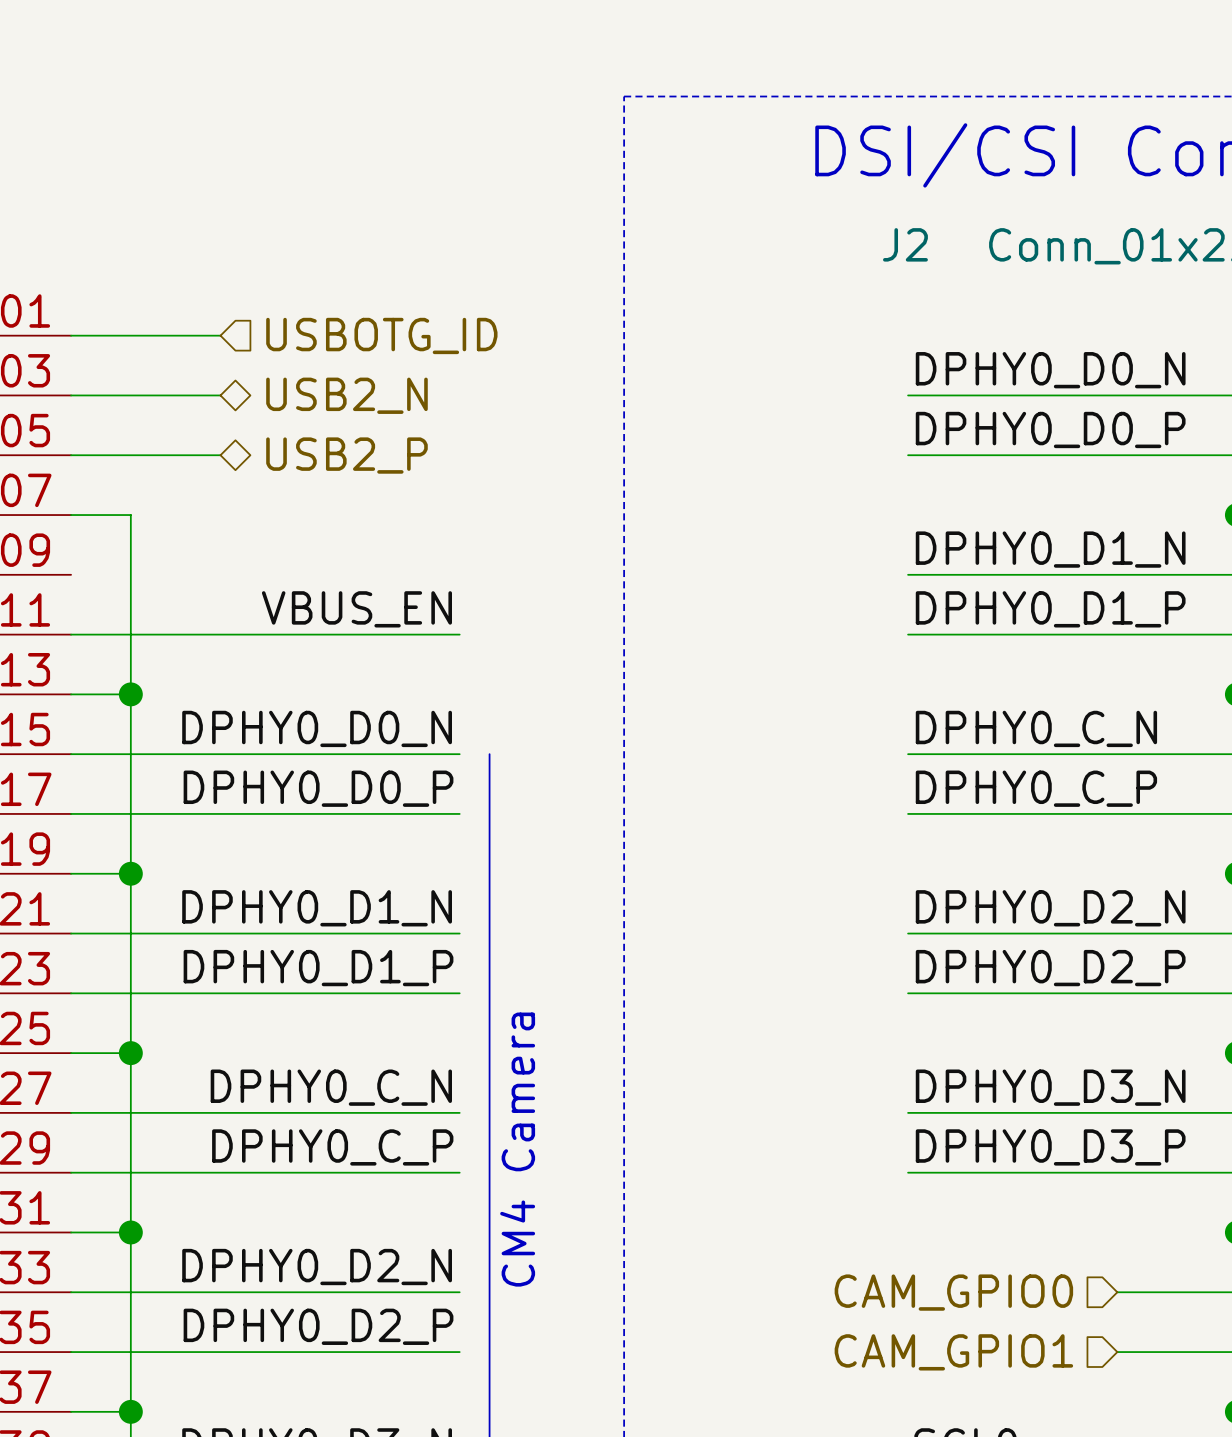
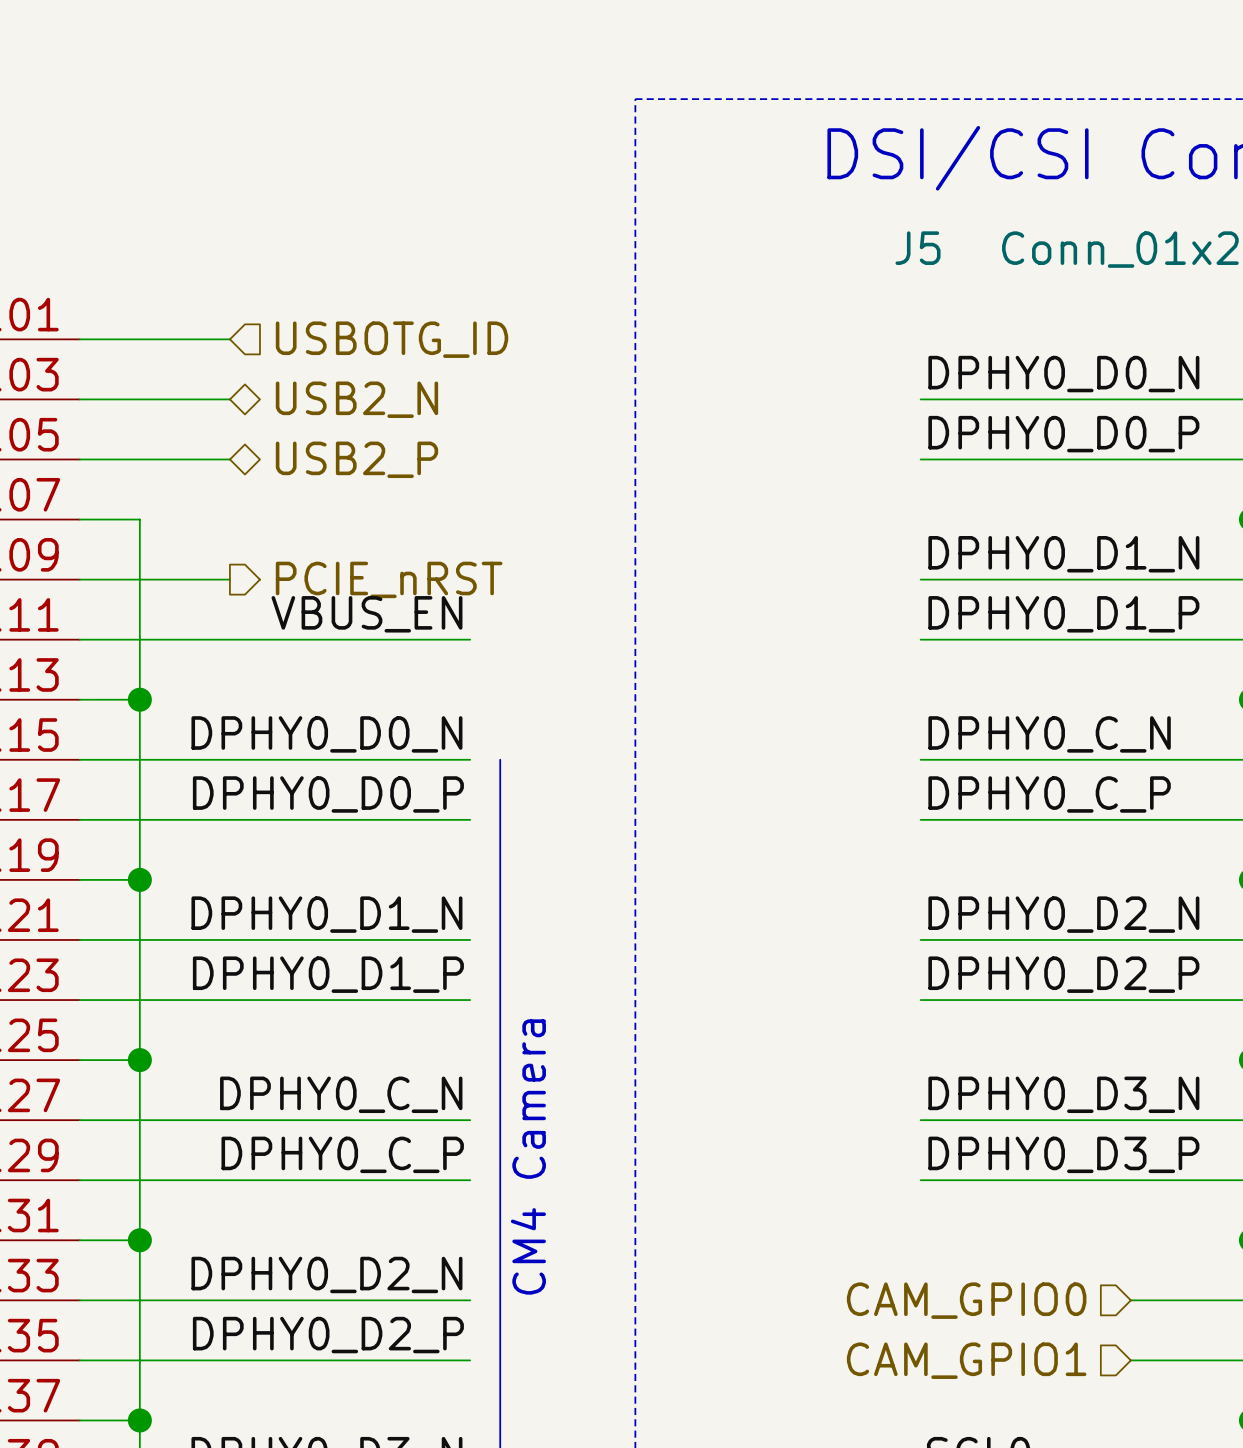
J2 name: J2 (905, 244) -> J5 (918, 248)
wire: none -> (79, 579) (229, 579)
hierarchical label: none -> PCIE_nRST (389, 579)

